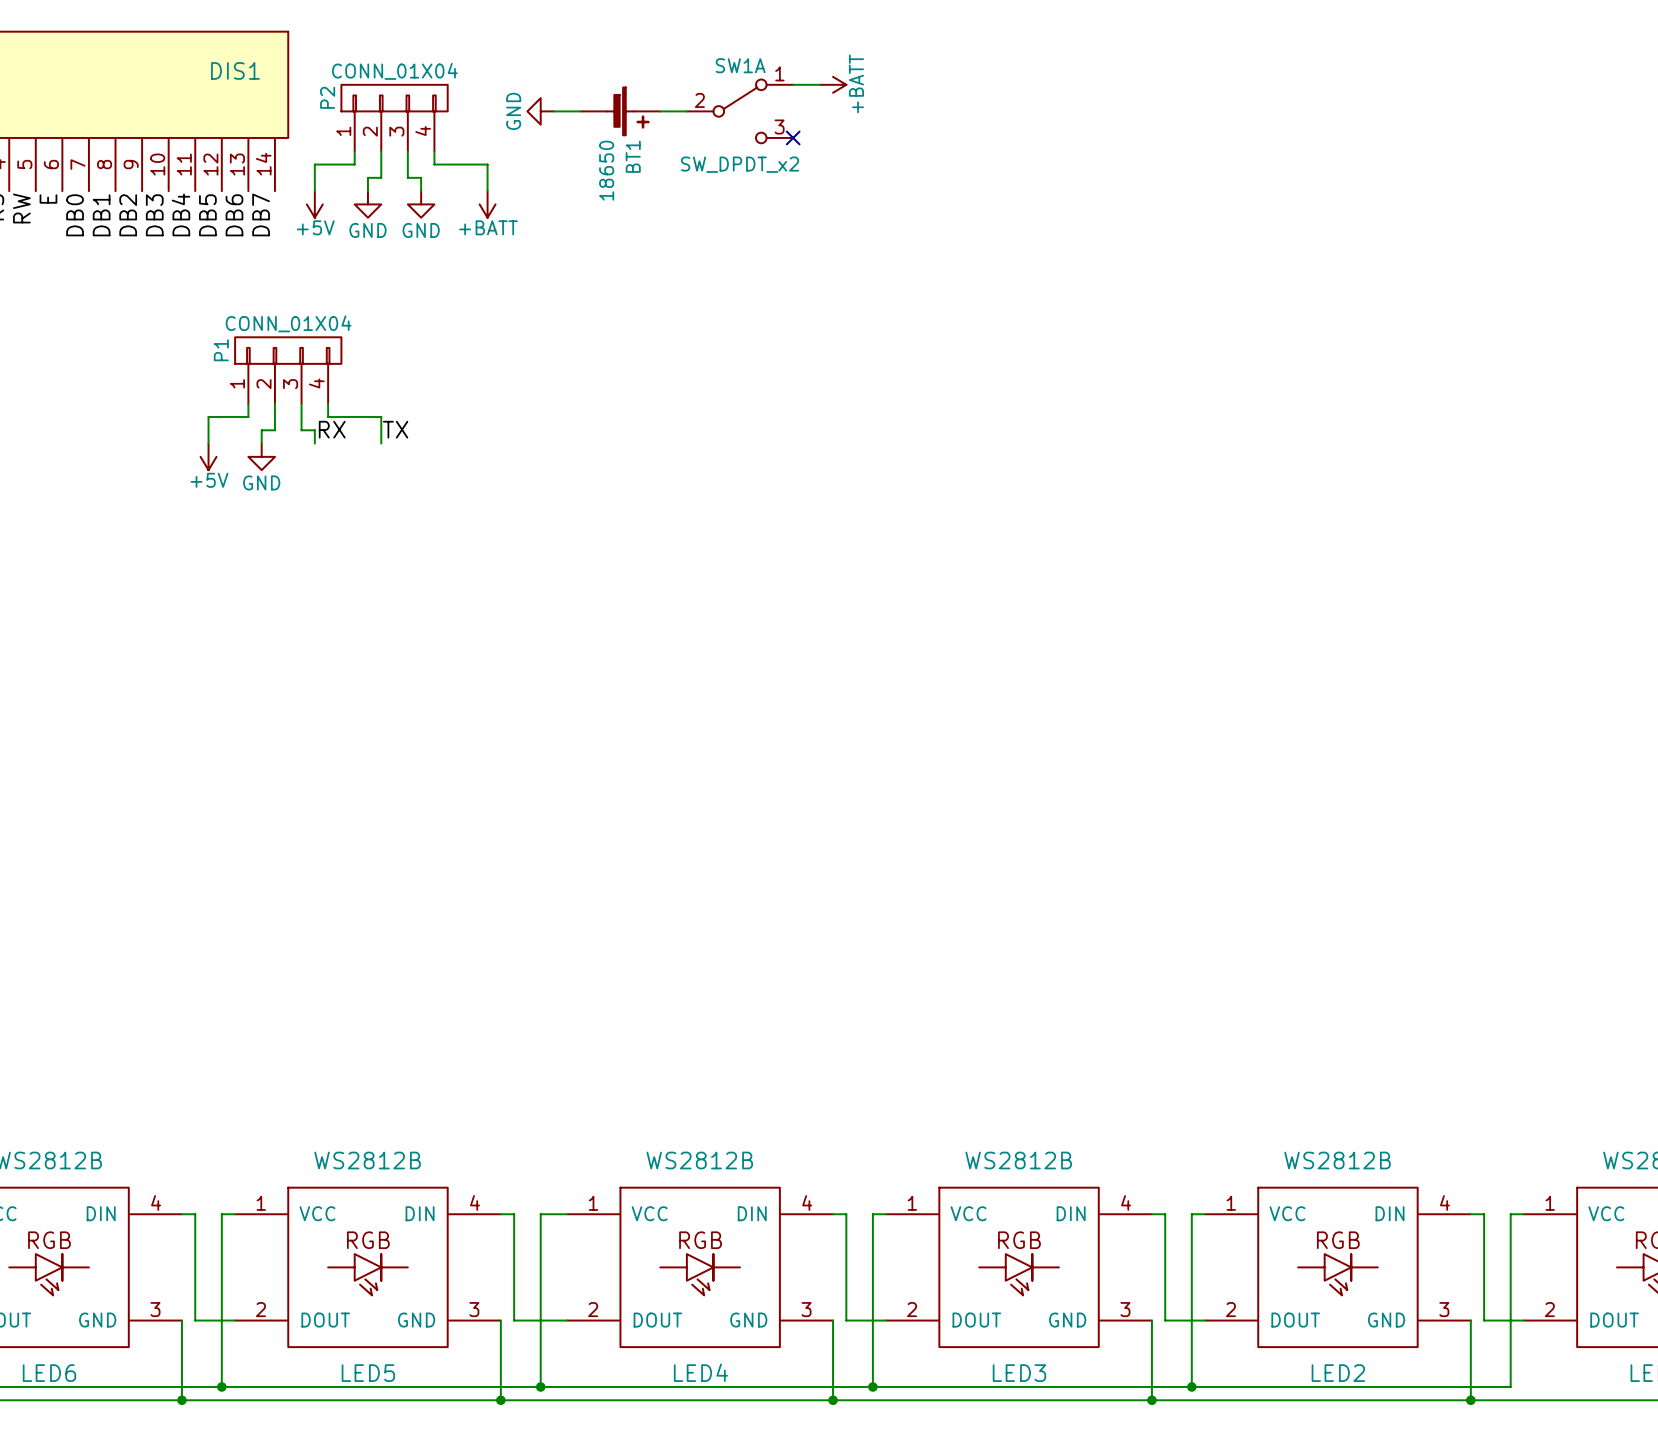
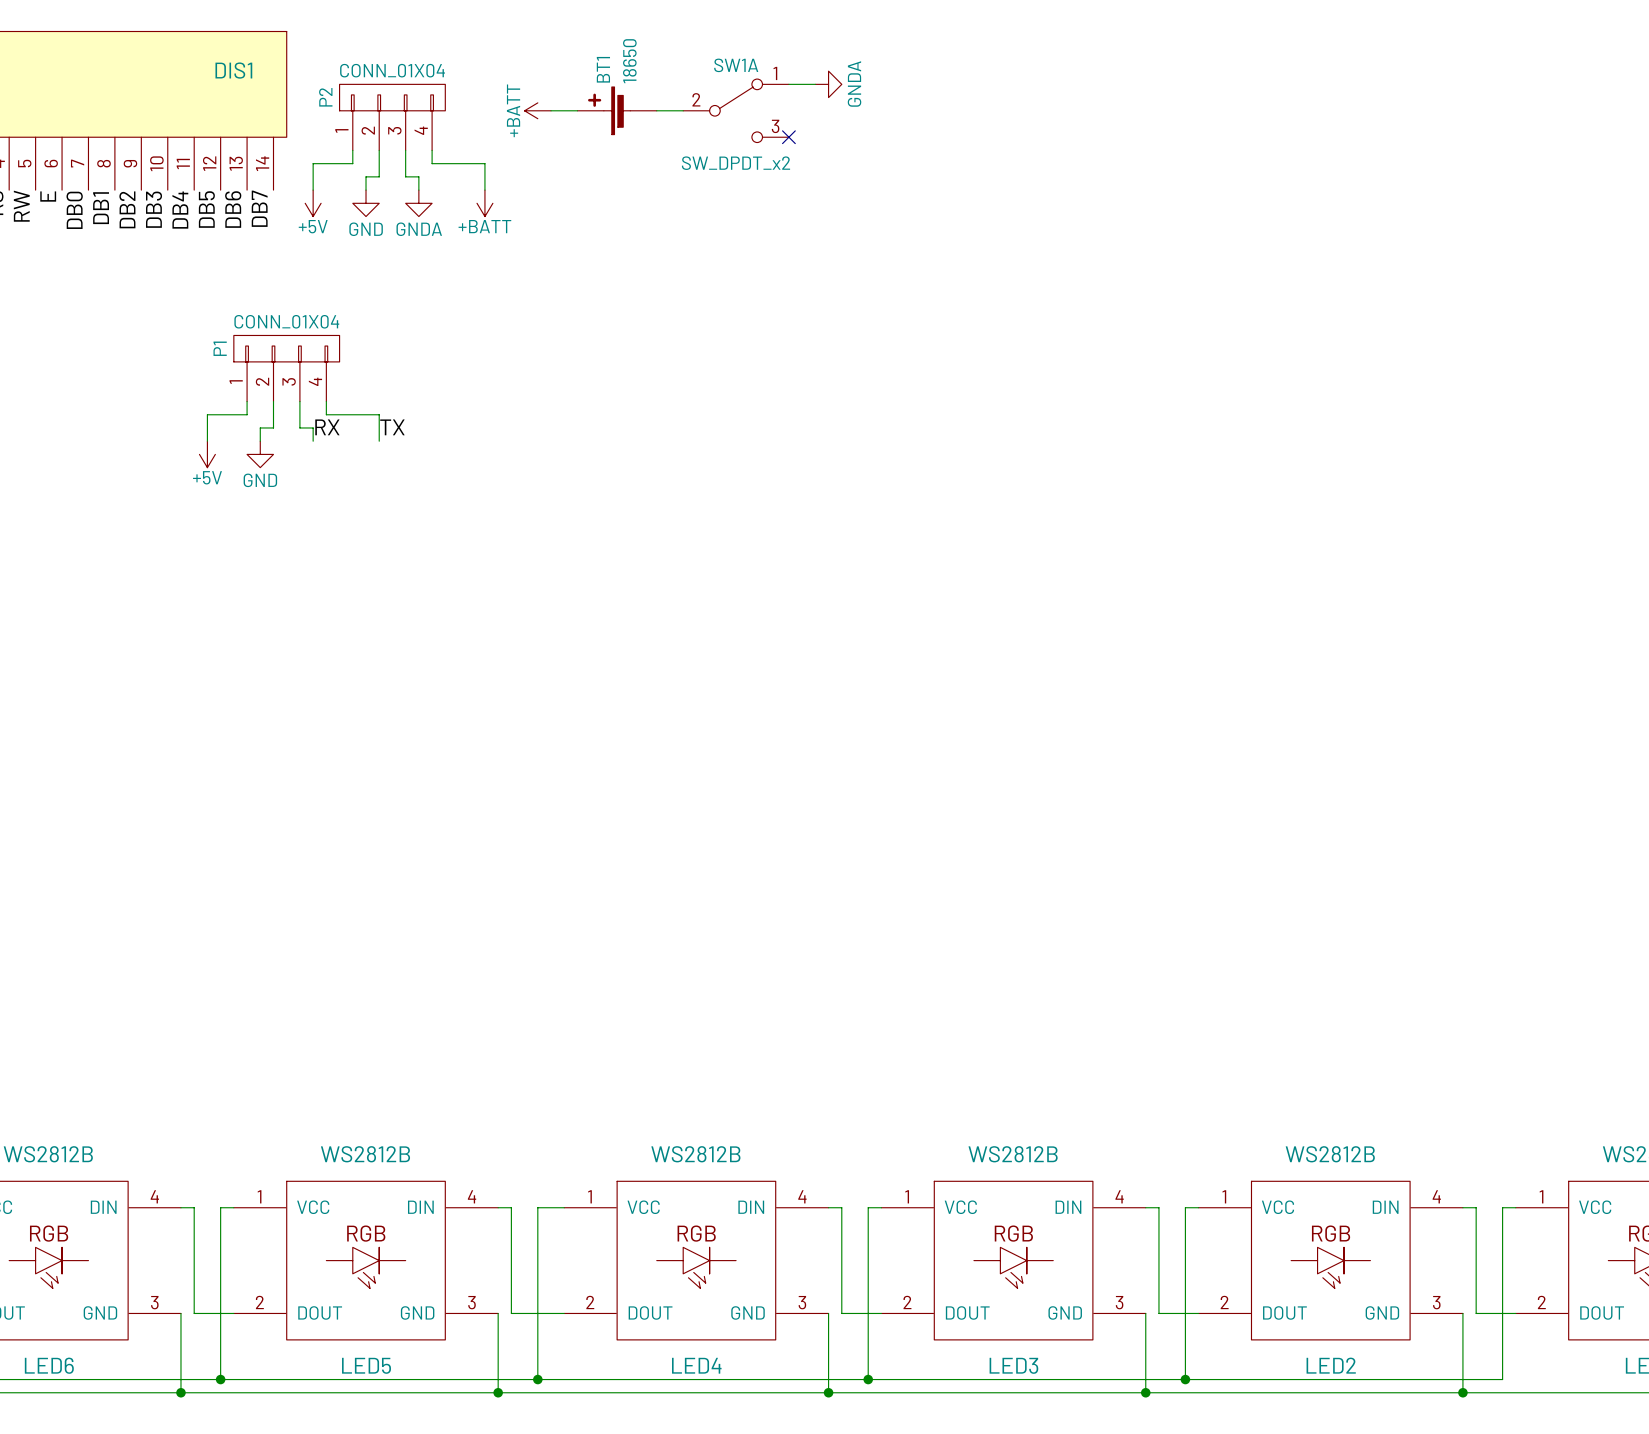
power symbol: +BATT (833, 84) -> GNDA (828, 84)
power symbol: GND (540, 111) -> +BATT (537, 110)
BT1 rotation: 0° (628, 111) -> 180° (609, 110)
power symbol: GND (421, 204) -> GNDA (418, 203)

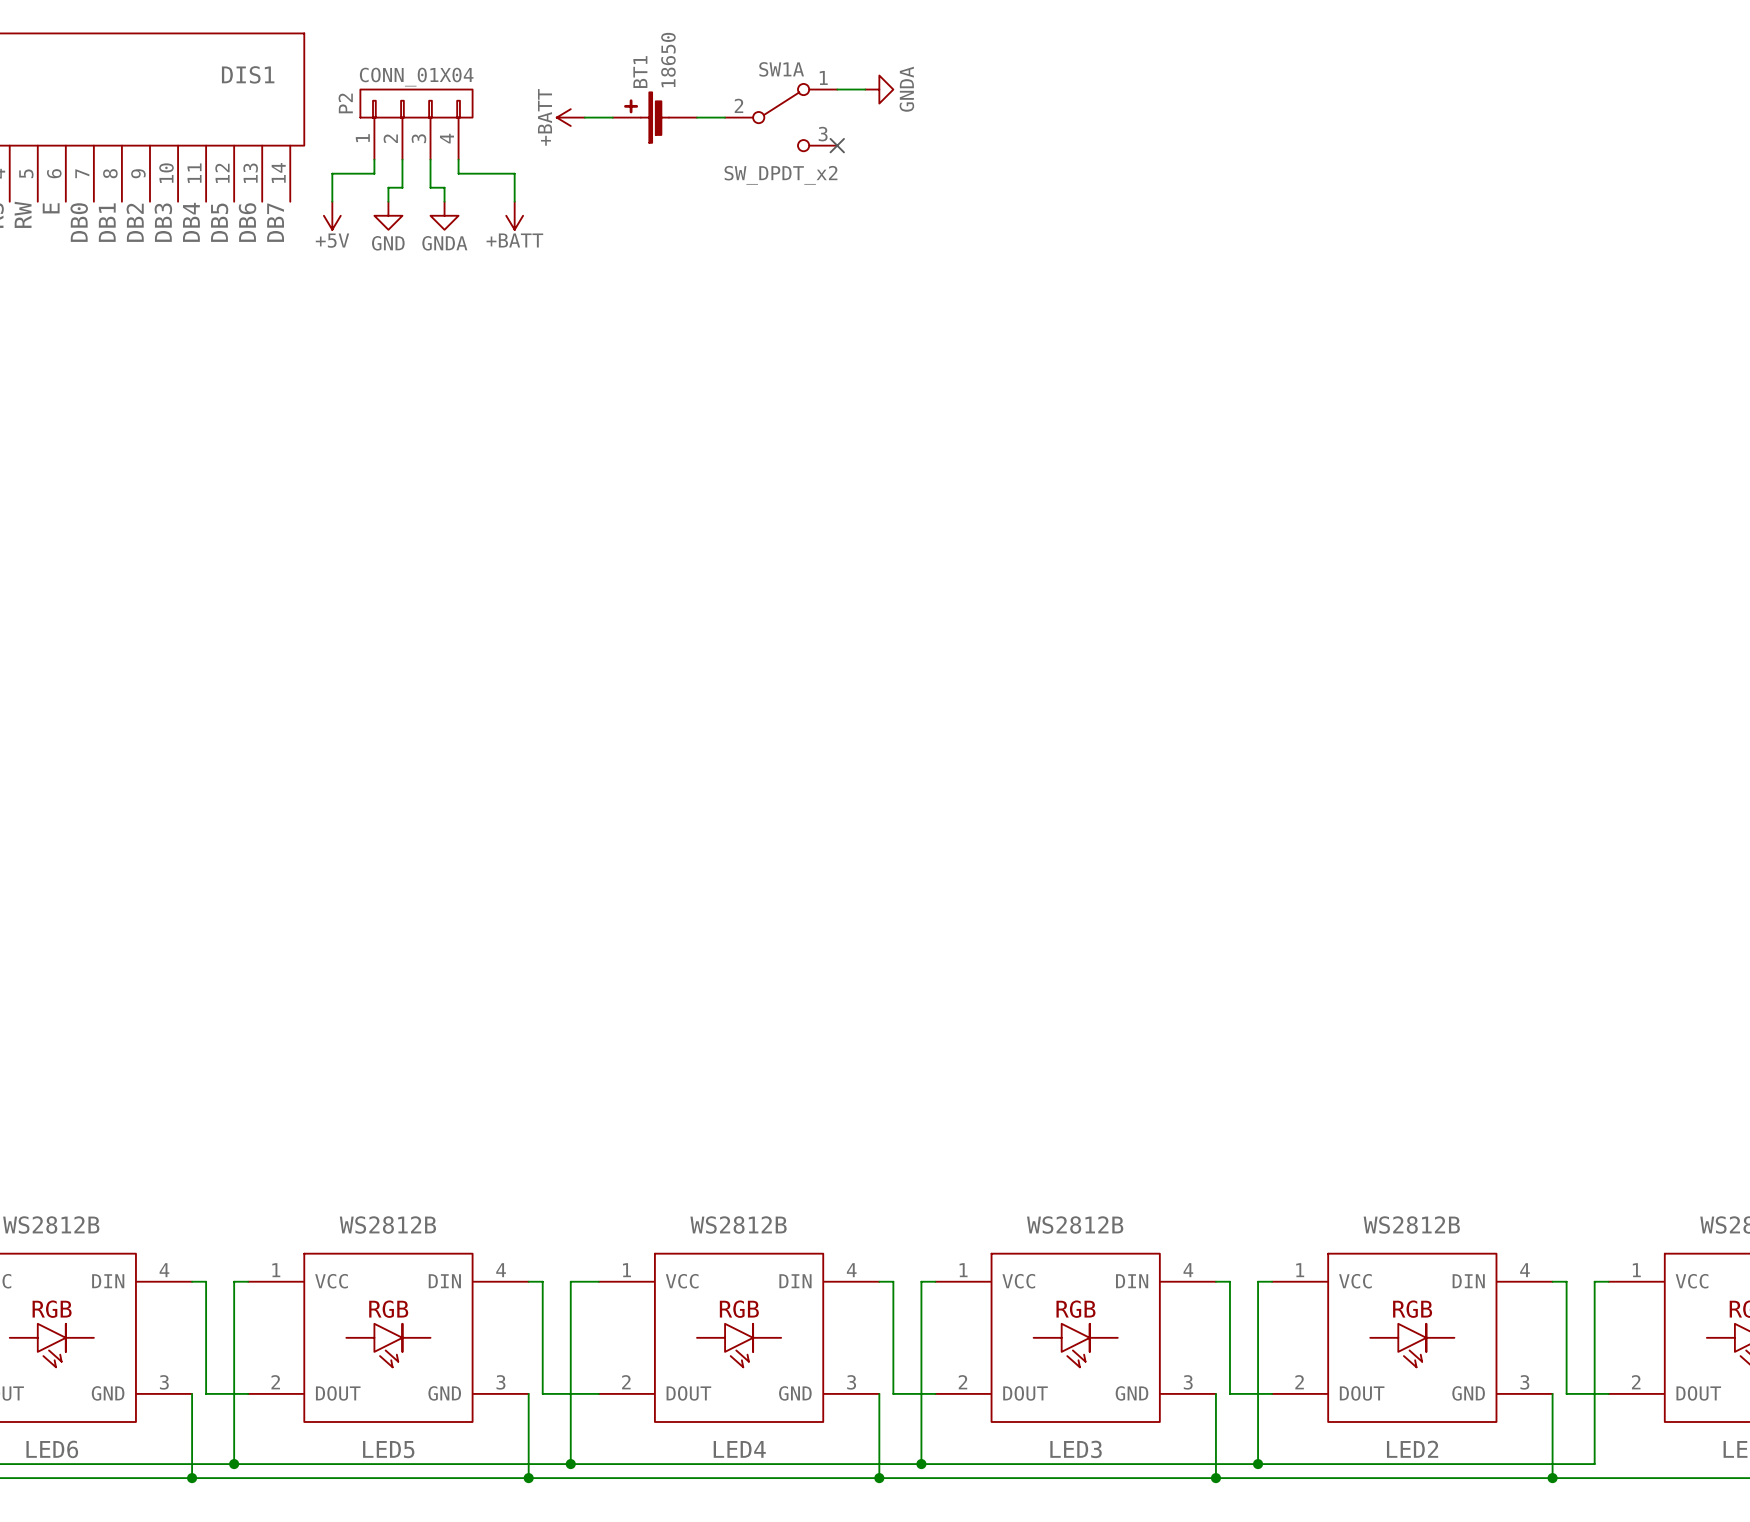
P1: CONN_01X04 (286, 368) -> none
wire: (247, 401) (247, 414) (207, 414) (207, 441) -> none
wire: (273, 401) (273, 427) (260, 427) (260, 441) -> none
wire: (299, 401) (299, 427) (313, 427) (313, 441) -> none
wire: (326, 401) (326, 414) (379, 414) (379, 441) -> none
label: RX (327, 427) -> none
label: TX (392, 427) -> none
power symbol: +5V (207, 454) -> none
power symbol: GND (260, 454) -> none

